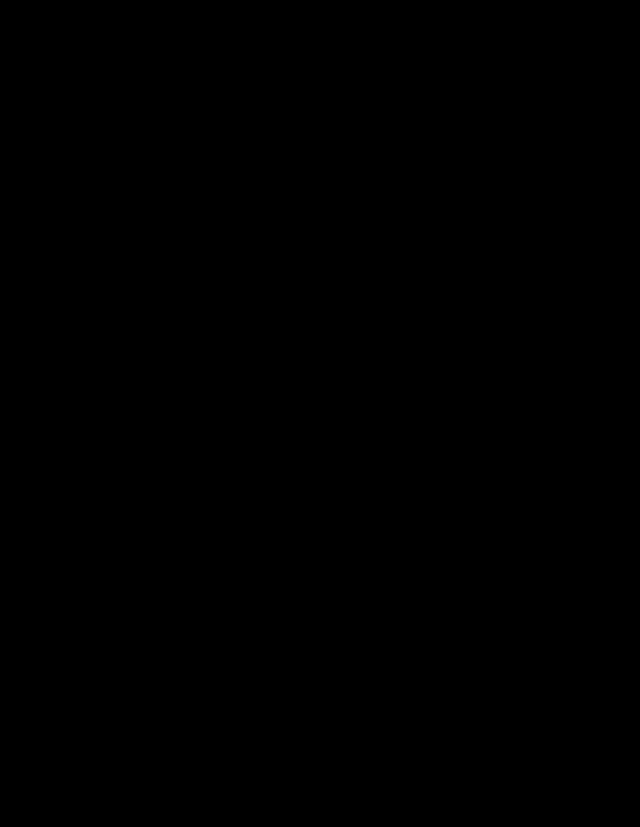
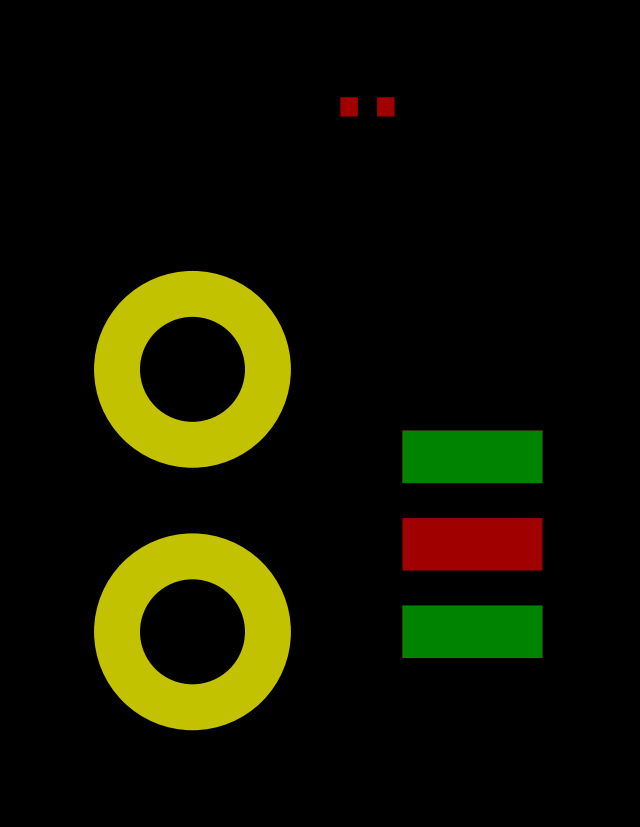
part: none -> (367, 106)
part: none -> (192, 369)
part: none -> (472, 544)
part: none -> (192, 631)

